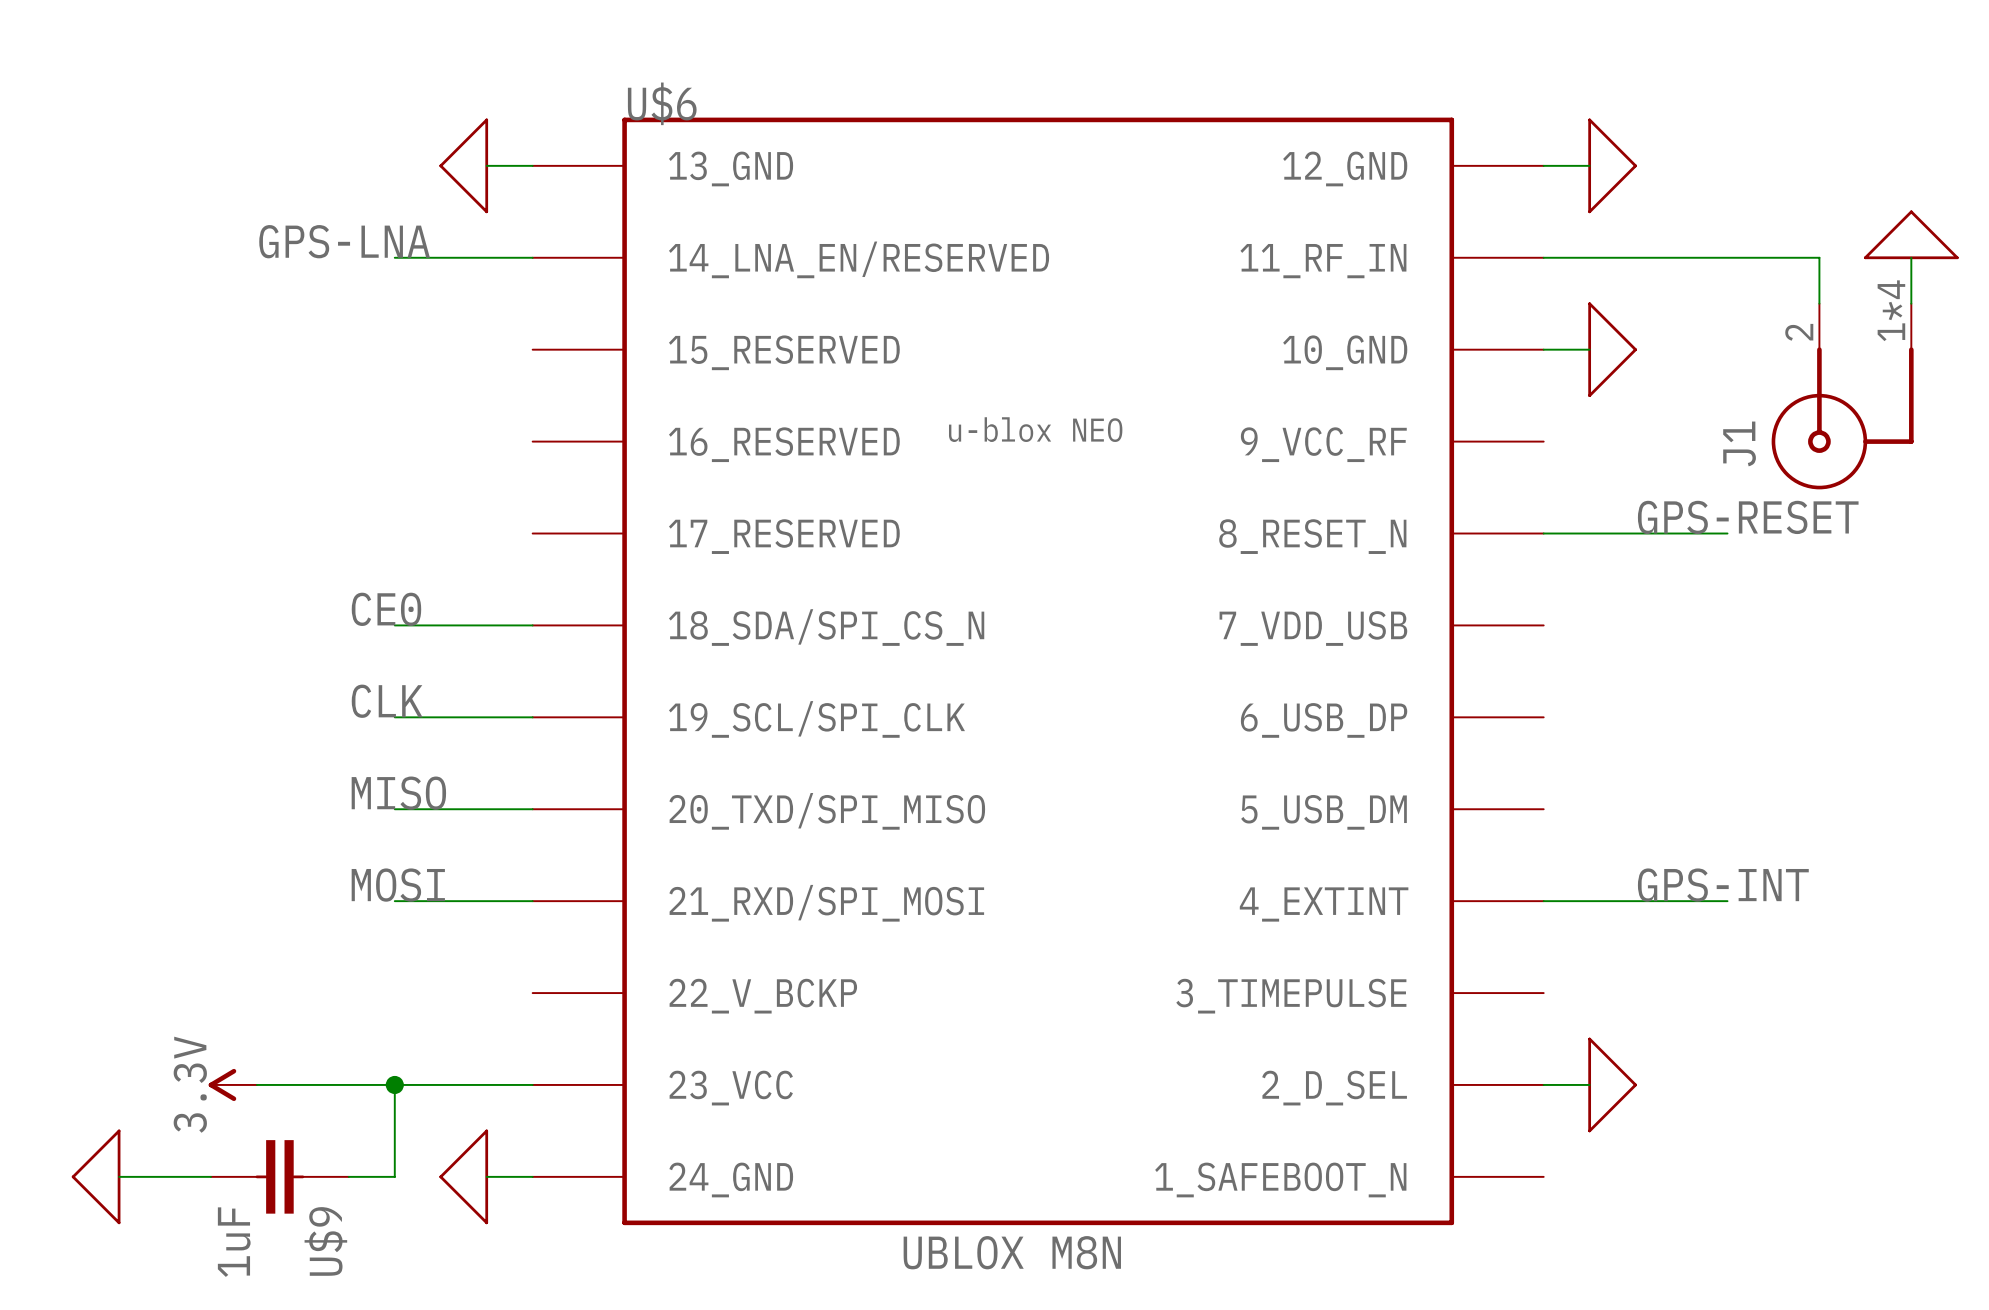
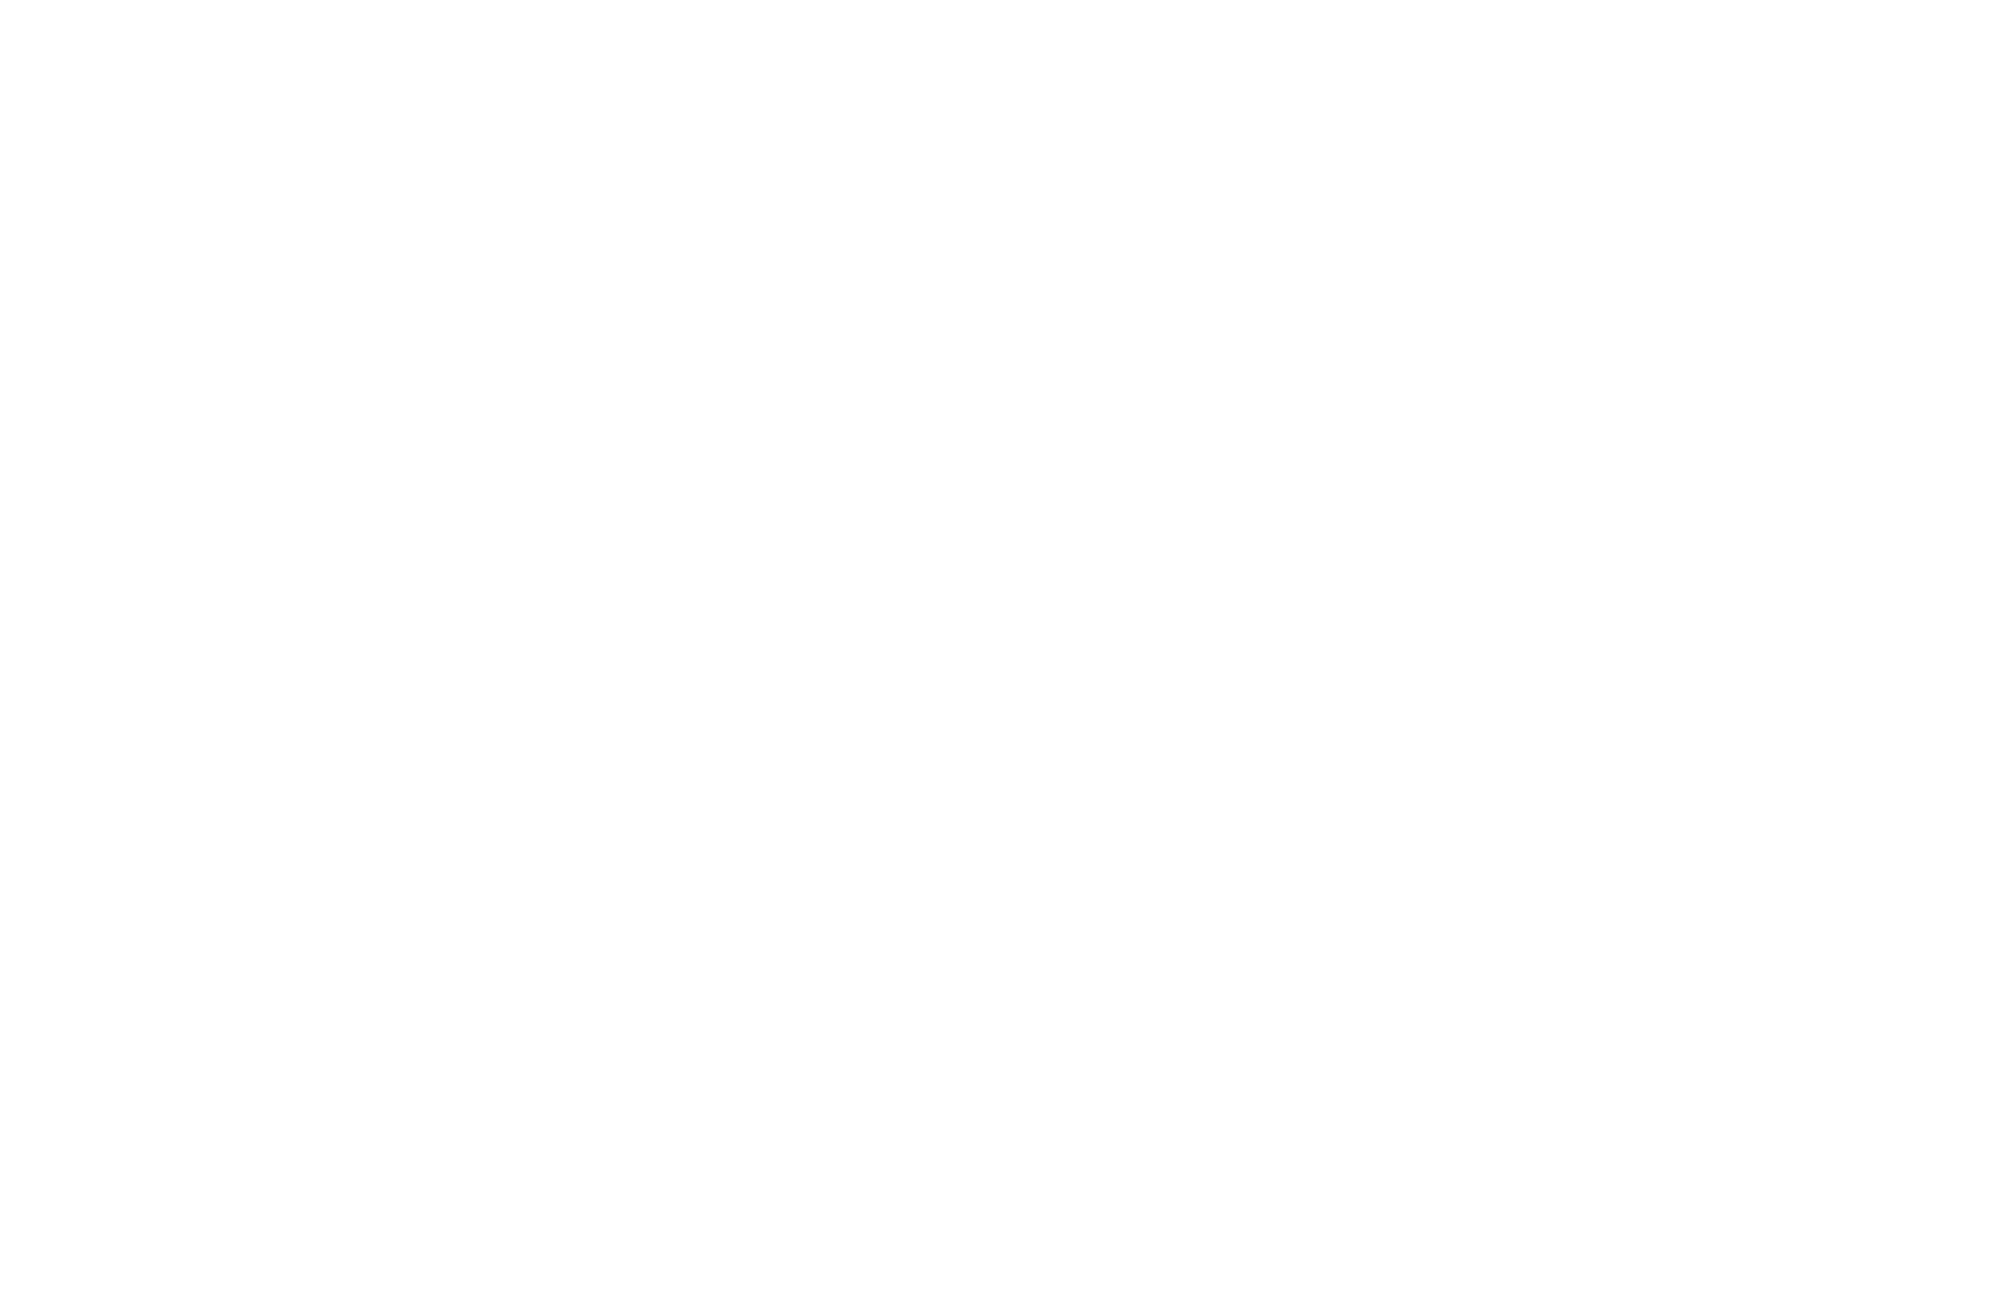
power symbol: (463, 165) -> none
wire: (486, 165) (532, 165) -> none
wire: (1543, 165) (1589, 165) -> none
power symbol: (1612, 165) -> none
power symbol: (1911, 234) -> none
label: GPS-LNA (344, 241) -> none
wire: (394, 257) (532, 257) -> none
wire: (1543, 257) (1819, 257) (1819, 303) -> none
wire: (1911, 257) (1911, 303) -> none
wire: (1543, 349) (1589, 349) -> none
power symbol: (1612, 349) -> none
J1: (1842, 396) -> none
label: GPS-RESET (1748, 517) -> none
wire: (1543, 533) (1727, 533) -> none
label: CE0 (386, 609) -> none
wire: (394, 625) (532, 625) -> none
U$6: (1038, 671) -> none
label: CLK (387, 701) -> none
wire: (394, 717) (532, 717) -> none
label: MISO (398, 793) -> none
wire: (394, 809) (532, 809) -> none
label: MOSI (398, 885) -> none
label: GPS-INT (1723, 885) -> none
wire: (394, 901) (532, 901) -> none
wire: (1543, 901) (1727, 901) -> none
power symbol: 3.3V (232, 1084) -> none
wire: (256, 1084) (532, 1084) -> none
wire: (394, 1084) (394, 1176) (348, 1176) -> none
junction: (394, 1084) -> none
wire: (1543, 1084) (1589, 1084) -> none
power symbol: (1612, 1084) -> none
power symbol: (96, 1176) -> none
wire: (119, 1176) (210, 1176) -> none
U$9: 1uF (279, 1176) -> none
power symbol: (463, 1176) -> none
wire: (486, 1176) (532, 1176) -> none

